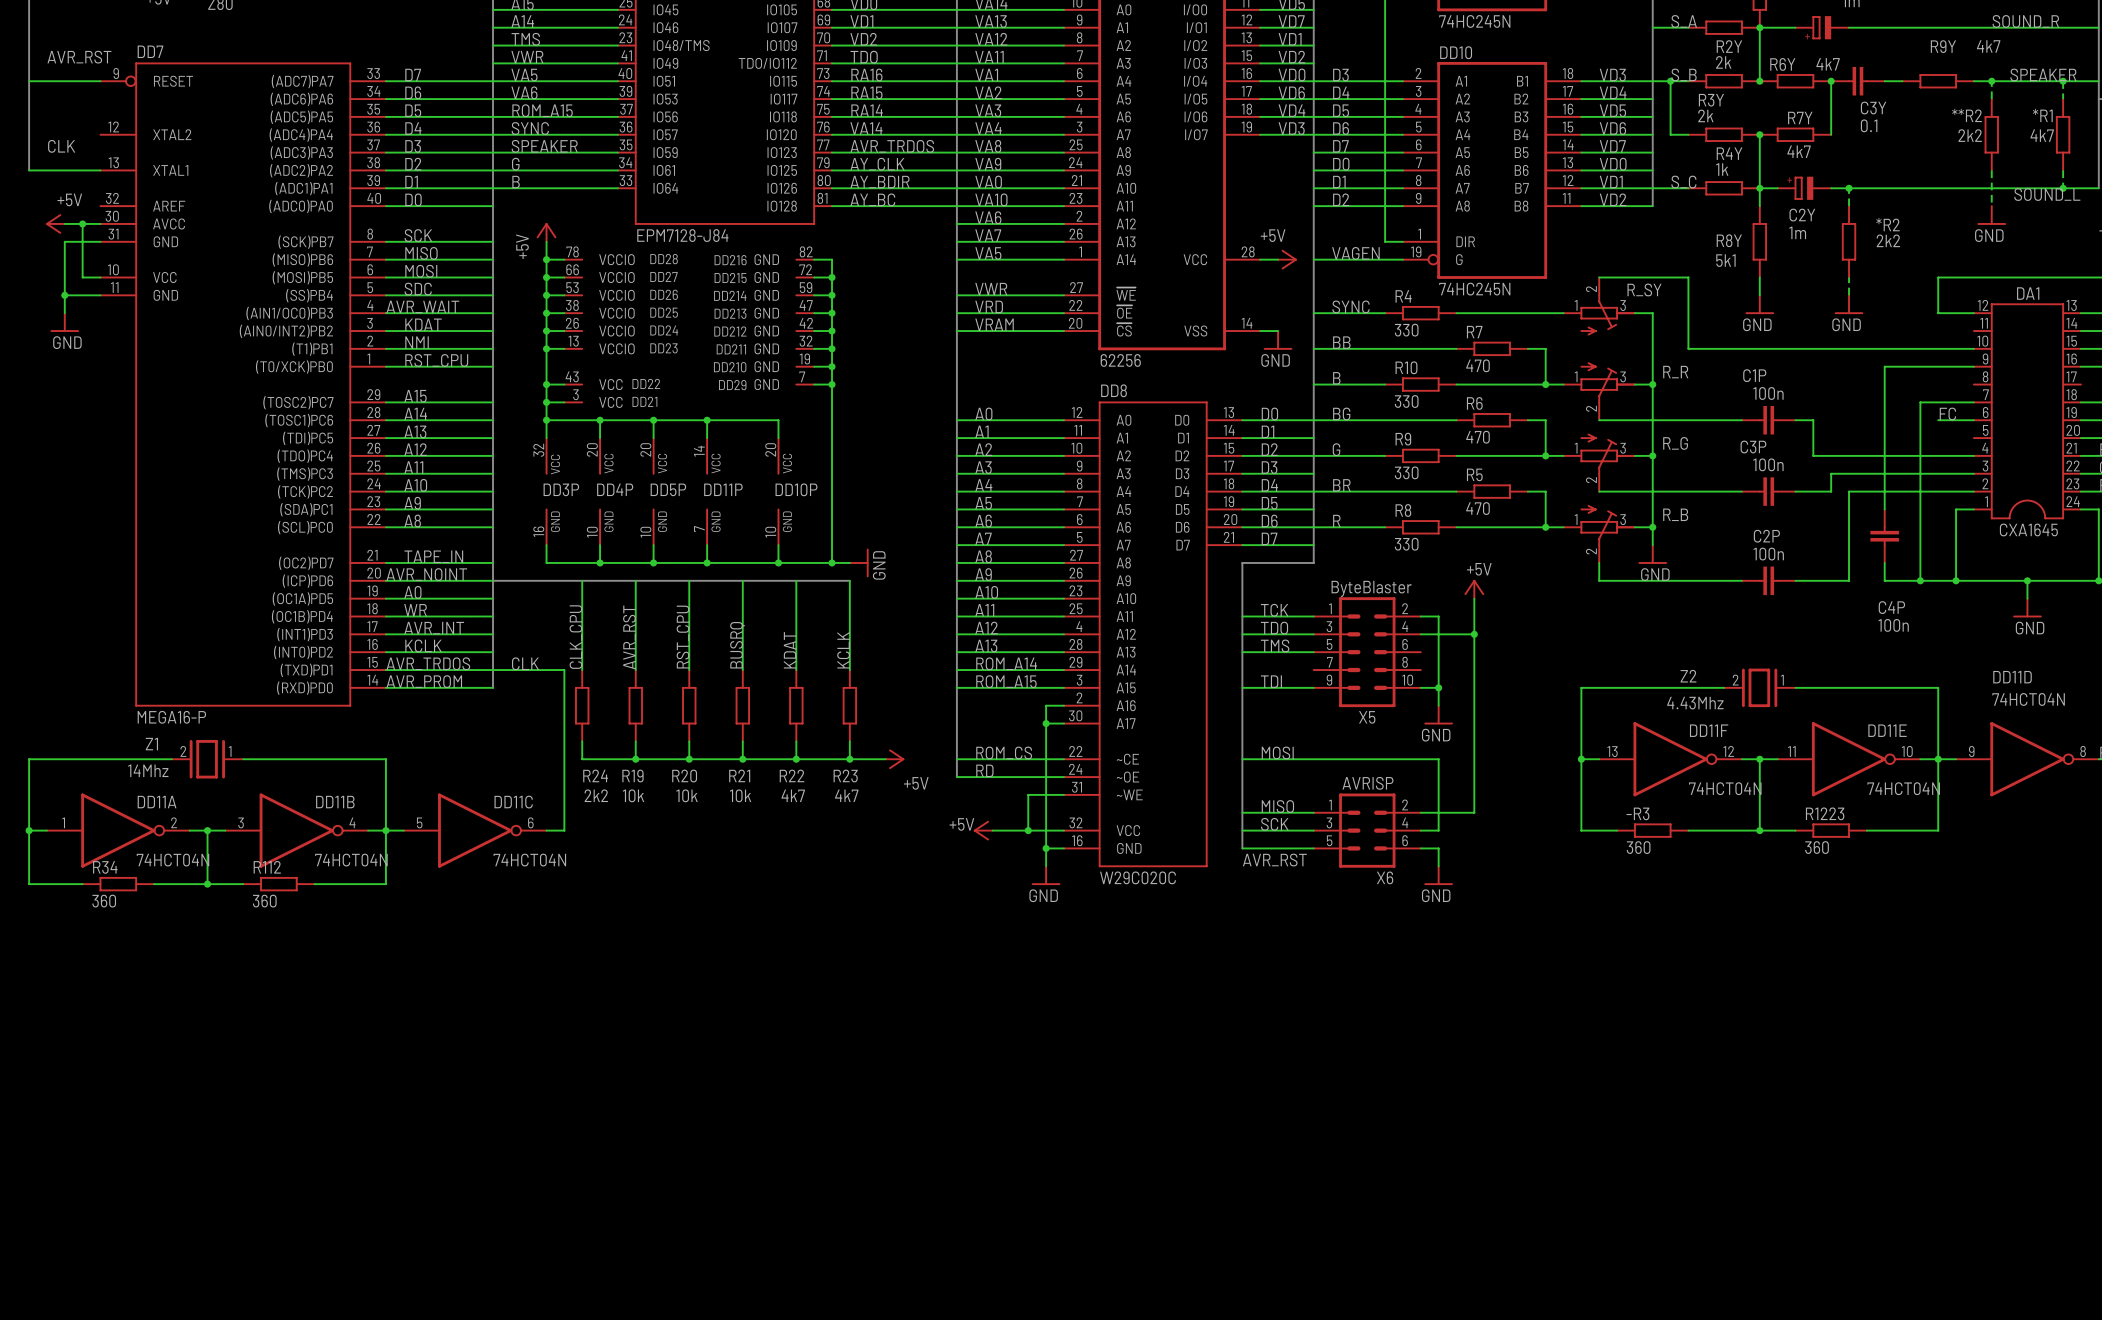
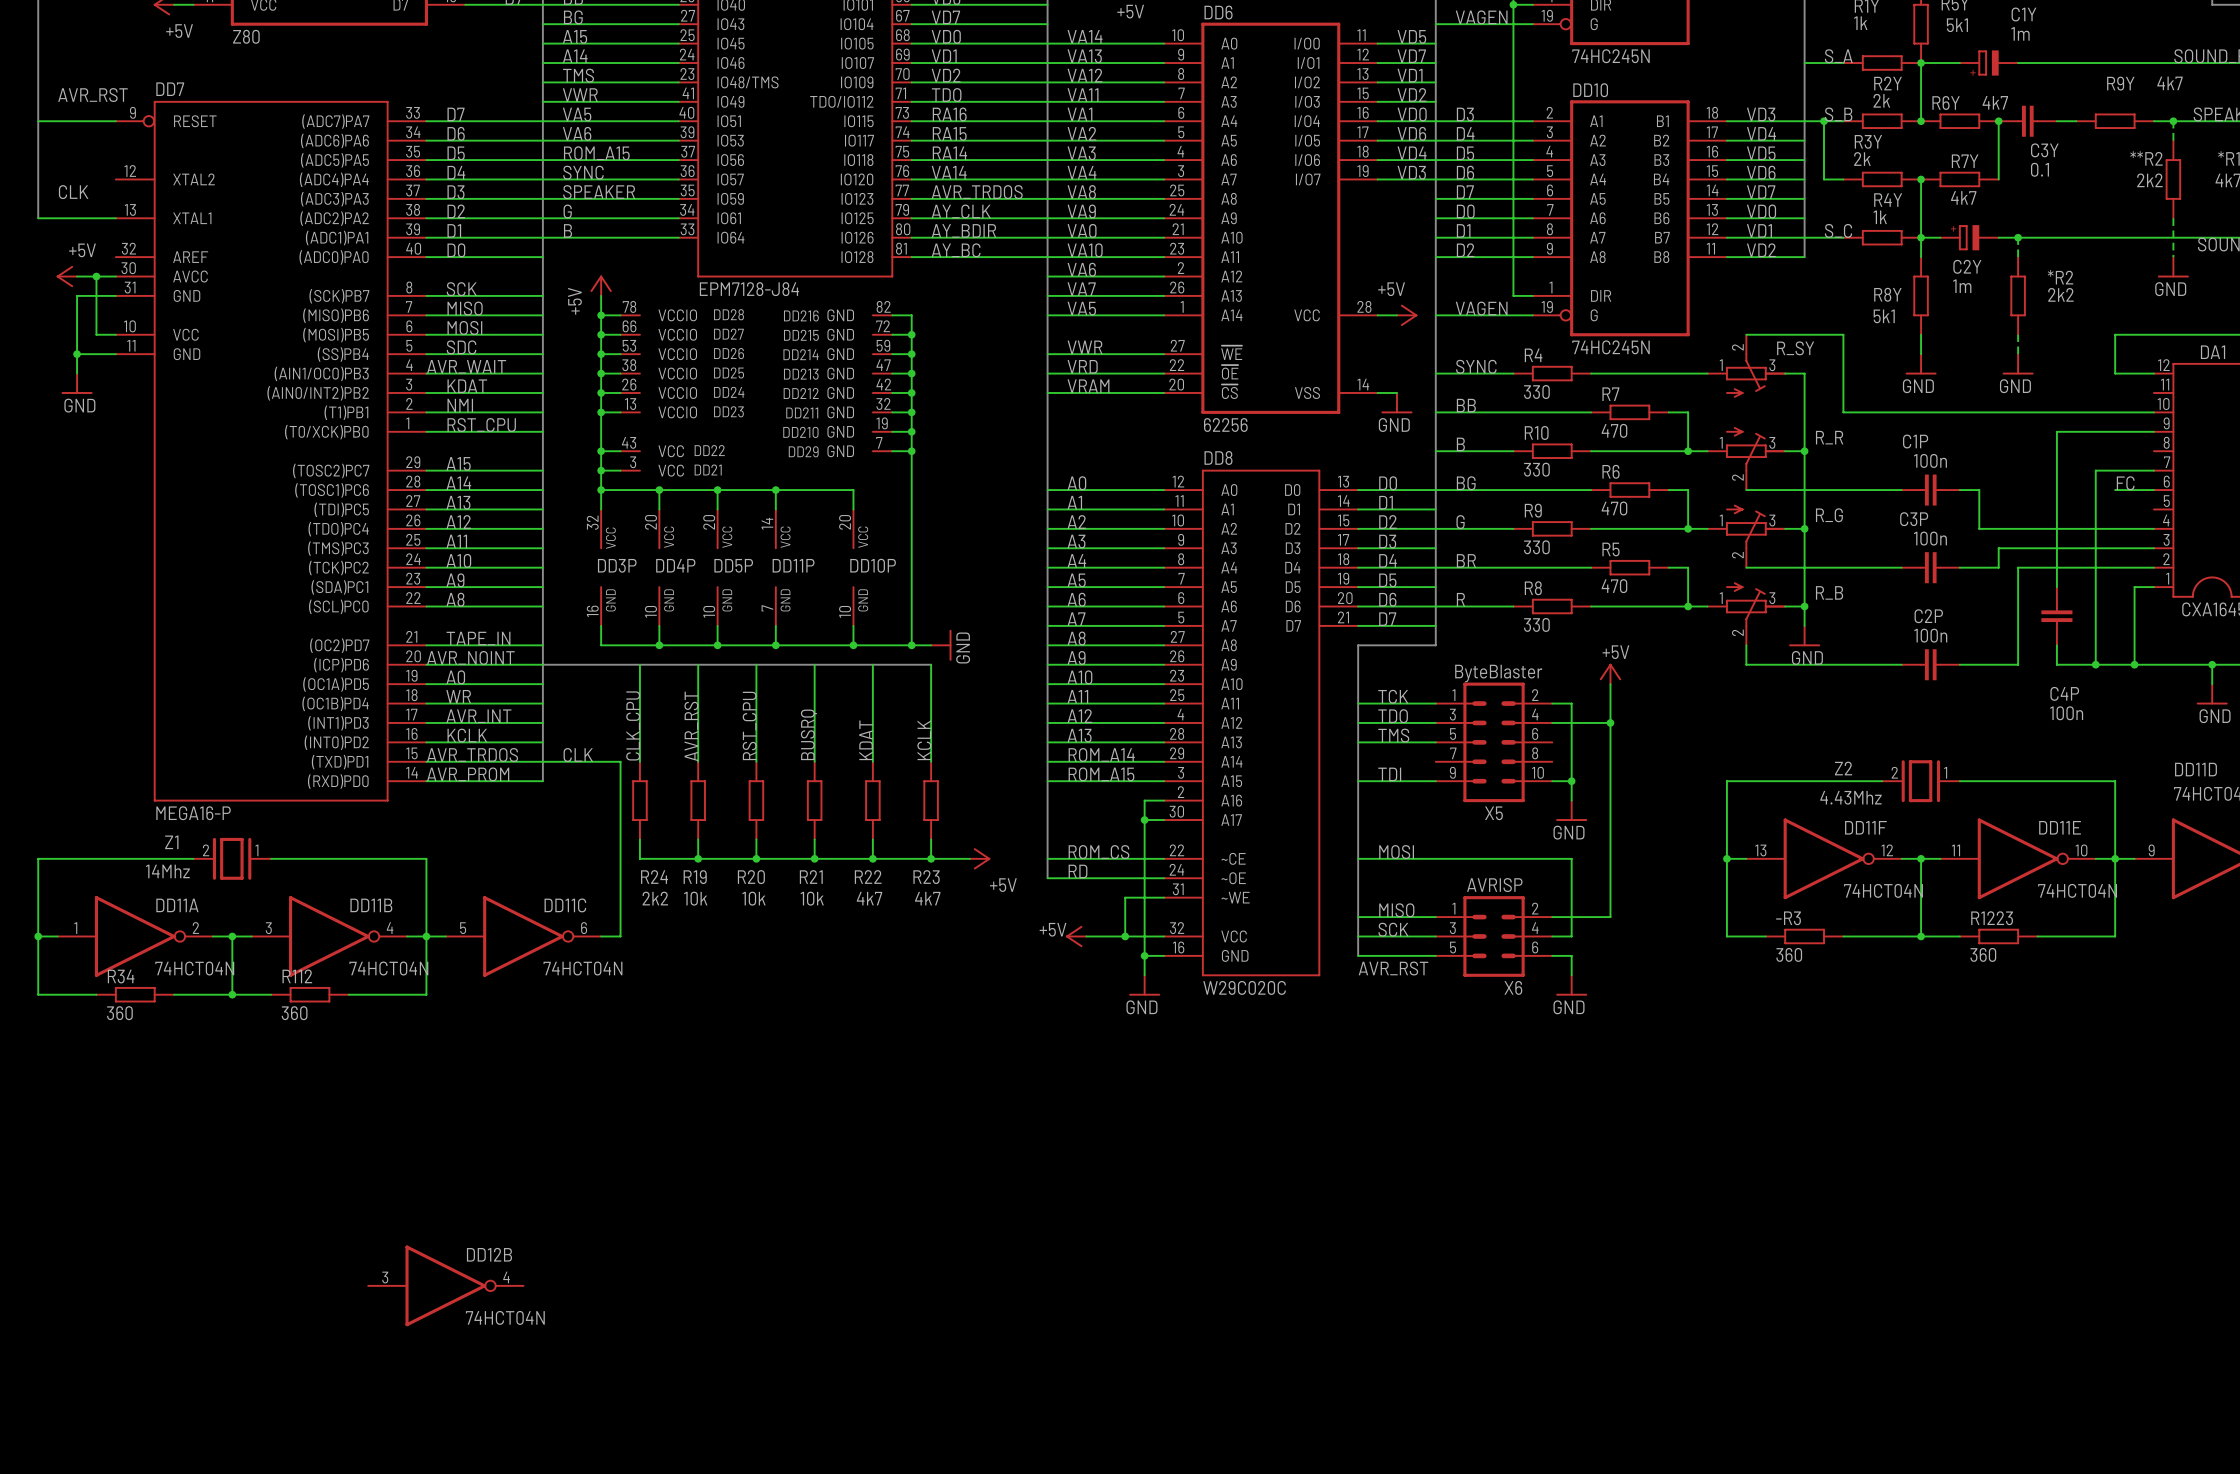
DD12B: none -> 74HCT04N (445, 1285)

